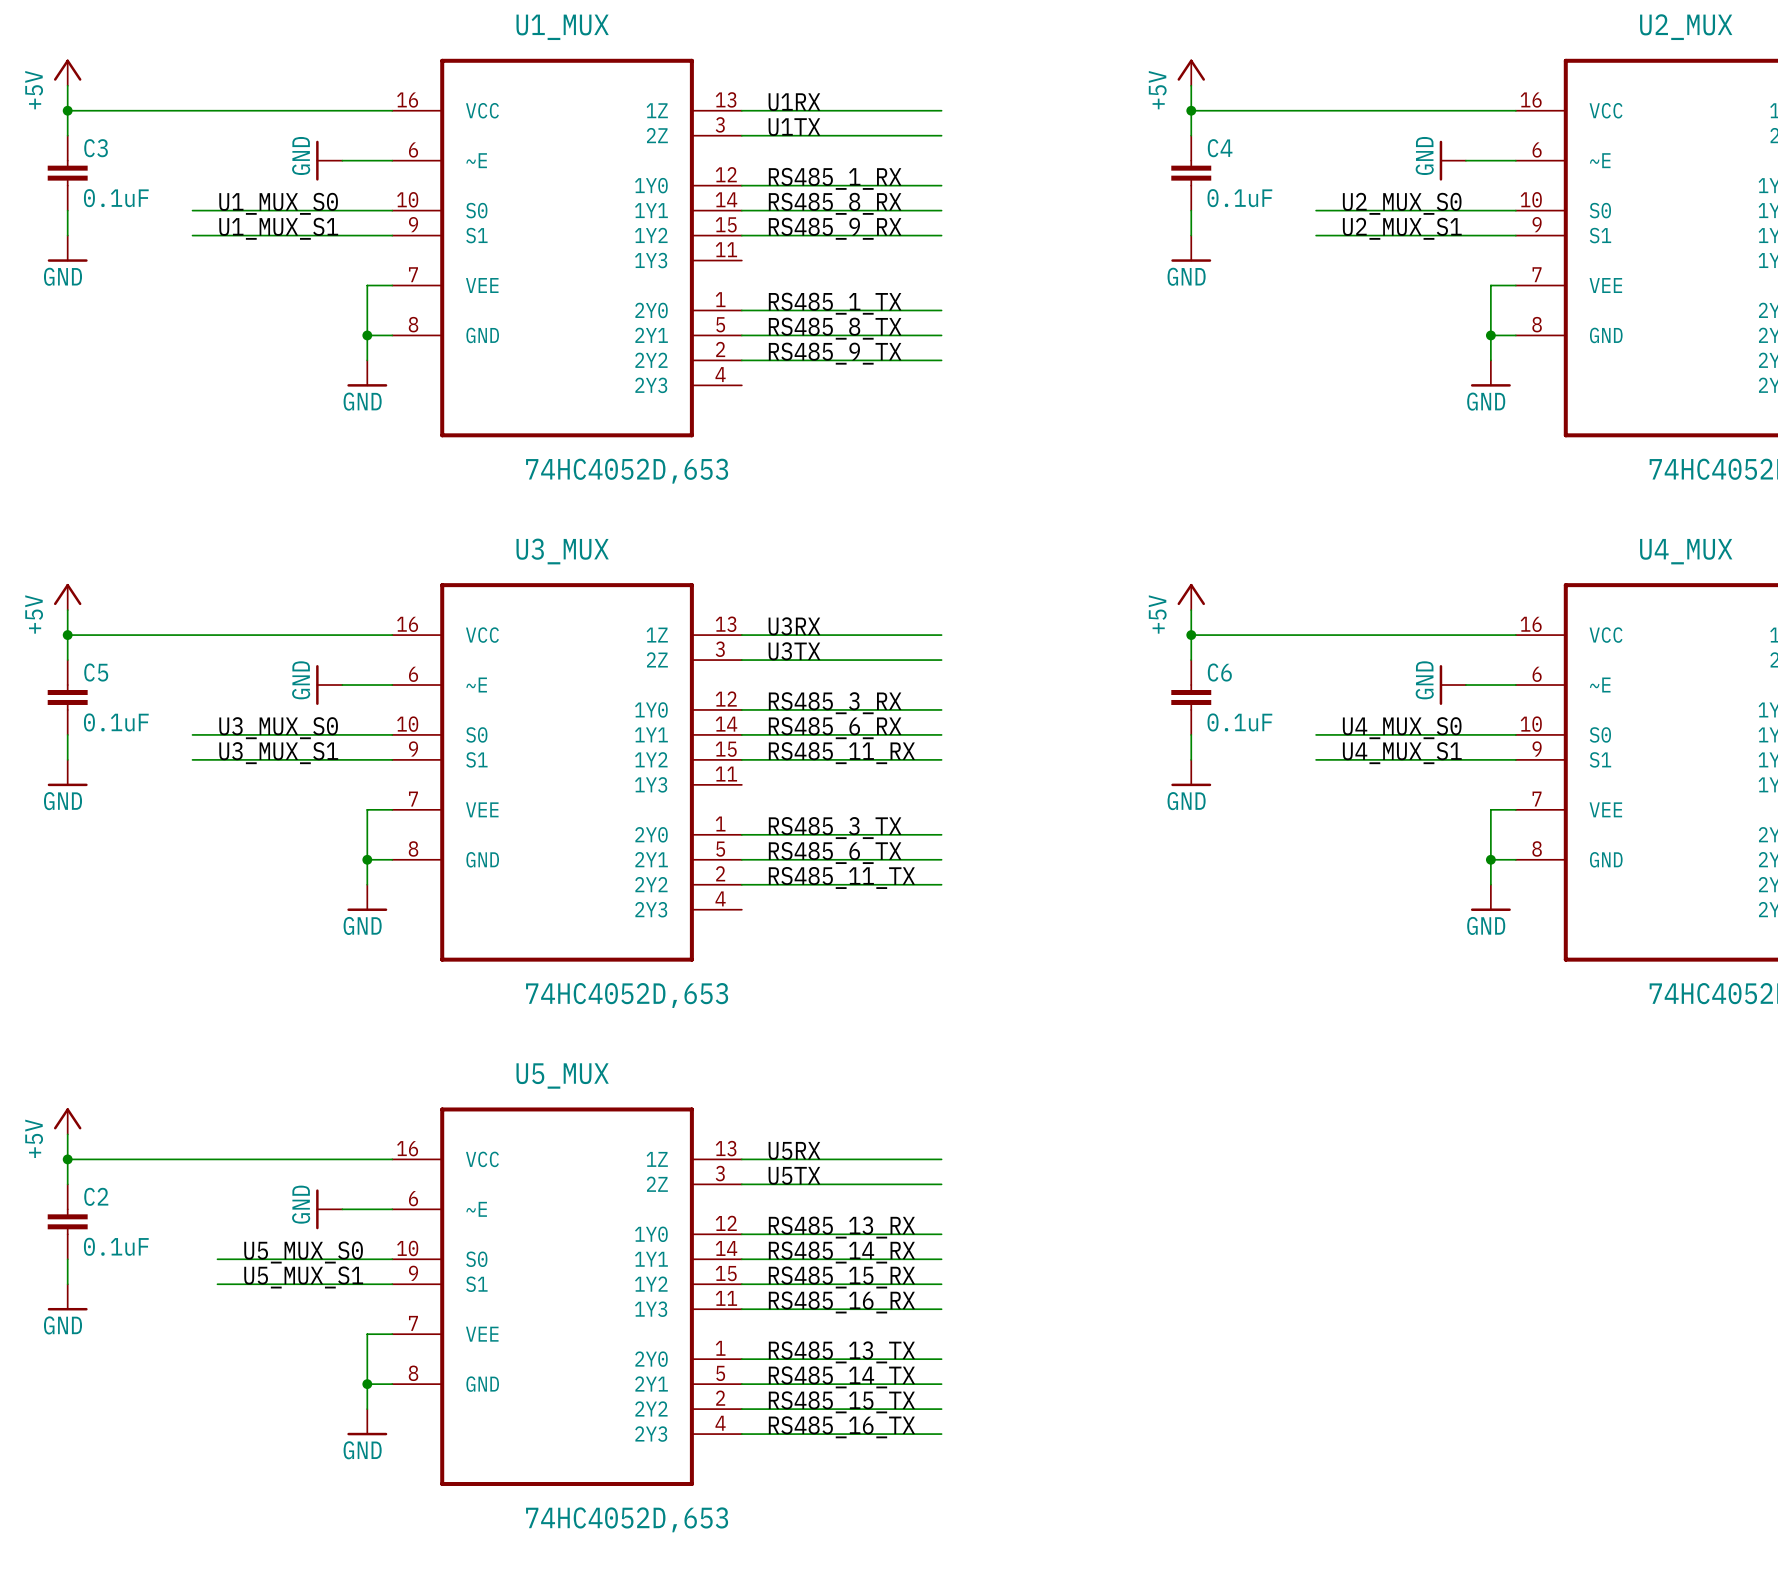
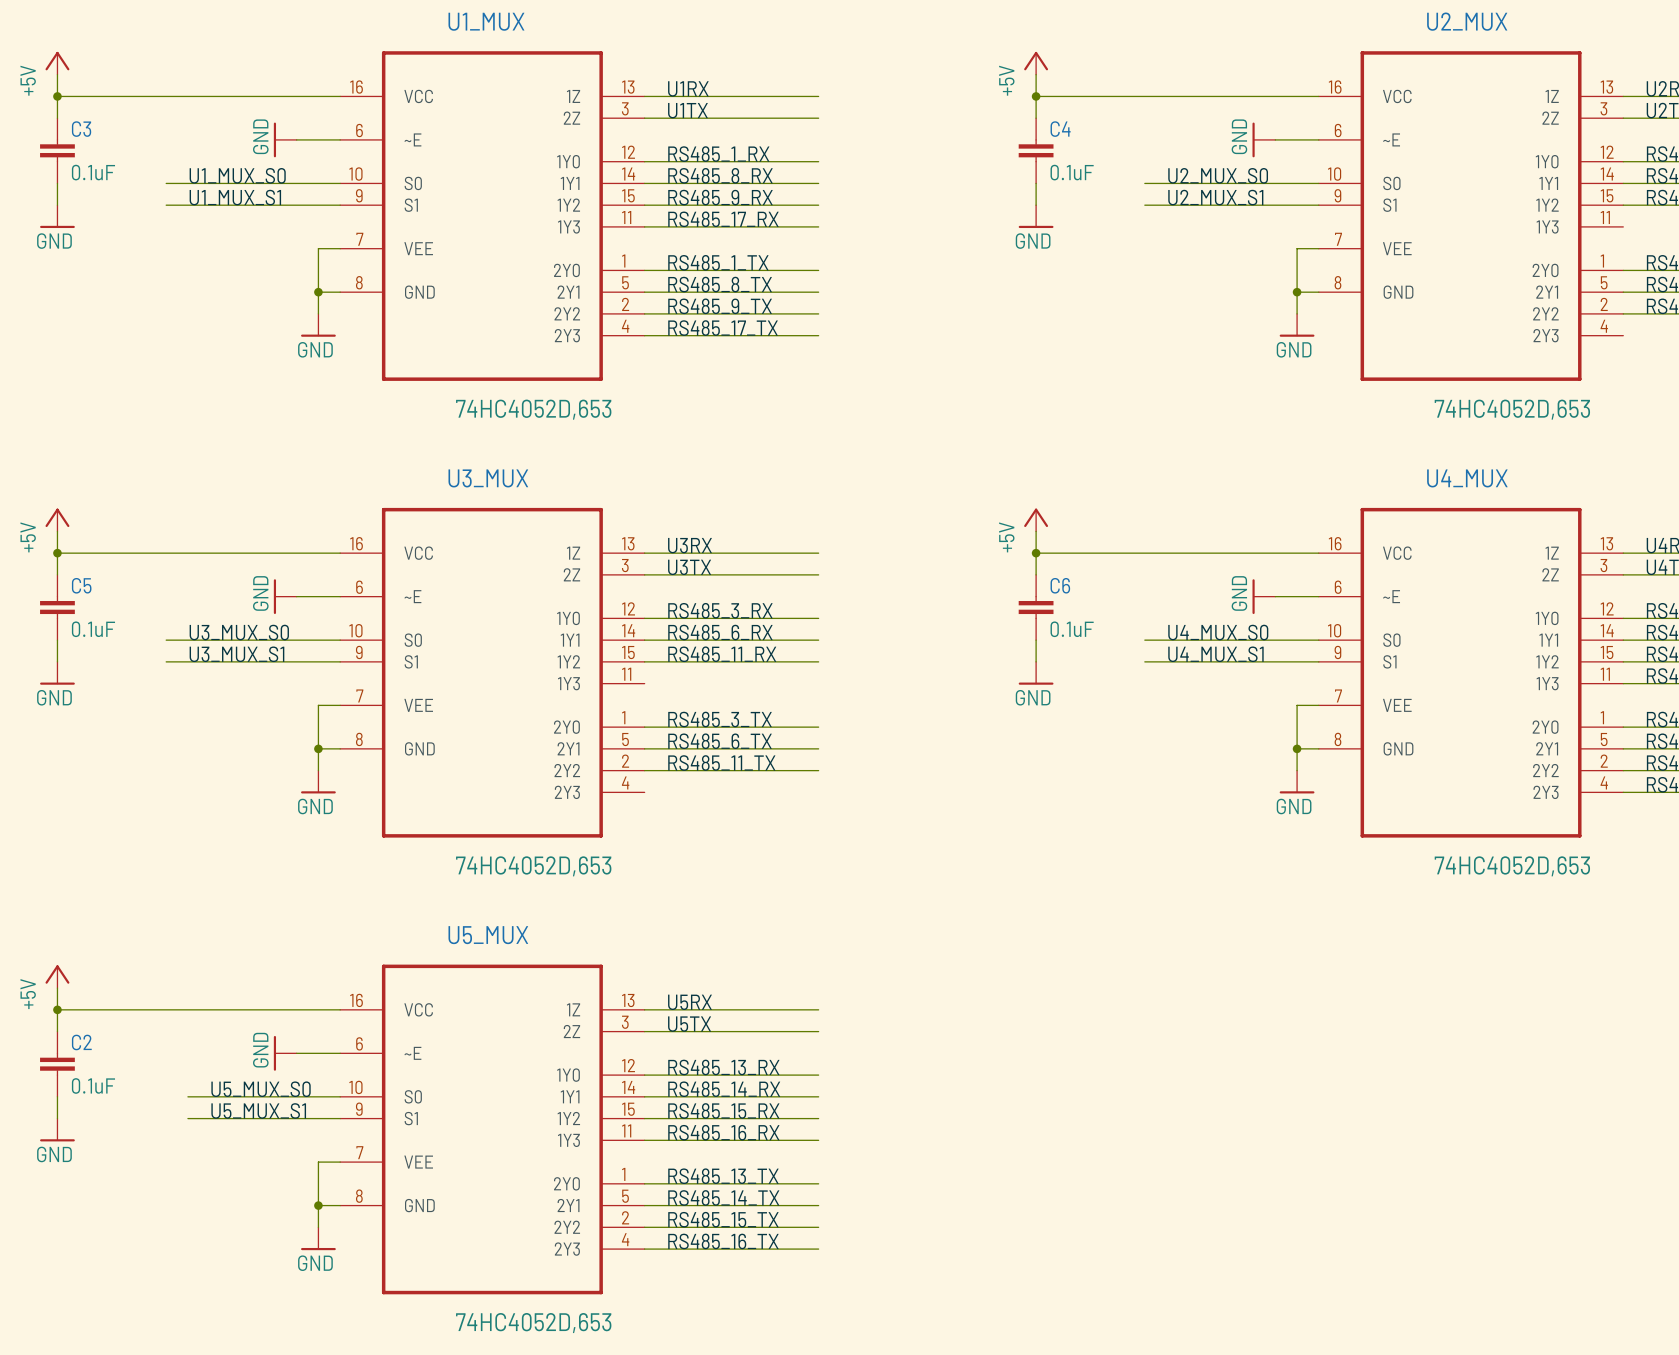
label: none -> RS485_17_RX (723, 219)
wire: none -> (644, 226) (818, 226)
label: none -> RS485_17_TX (723, 328)
wire: none -> (644, 335) (818, 335)

